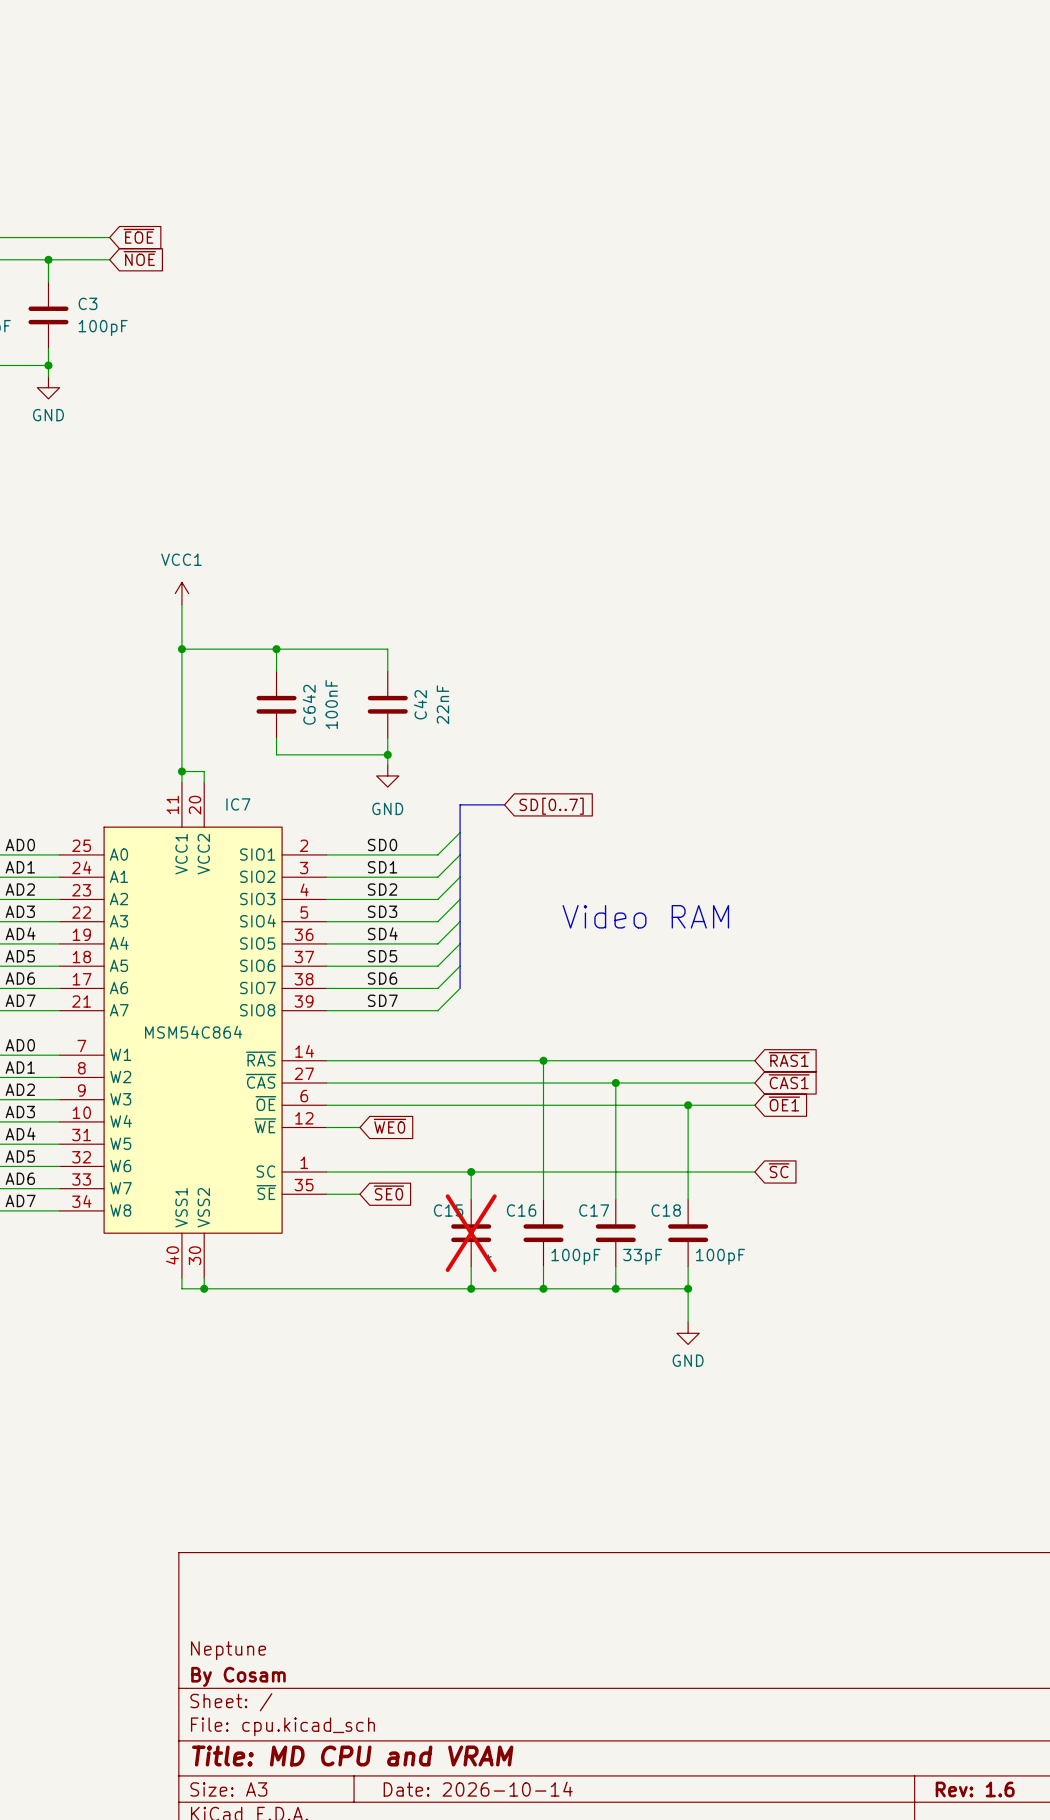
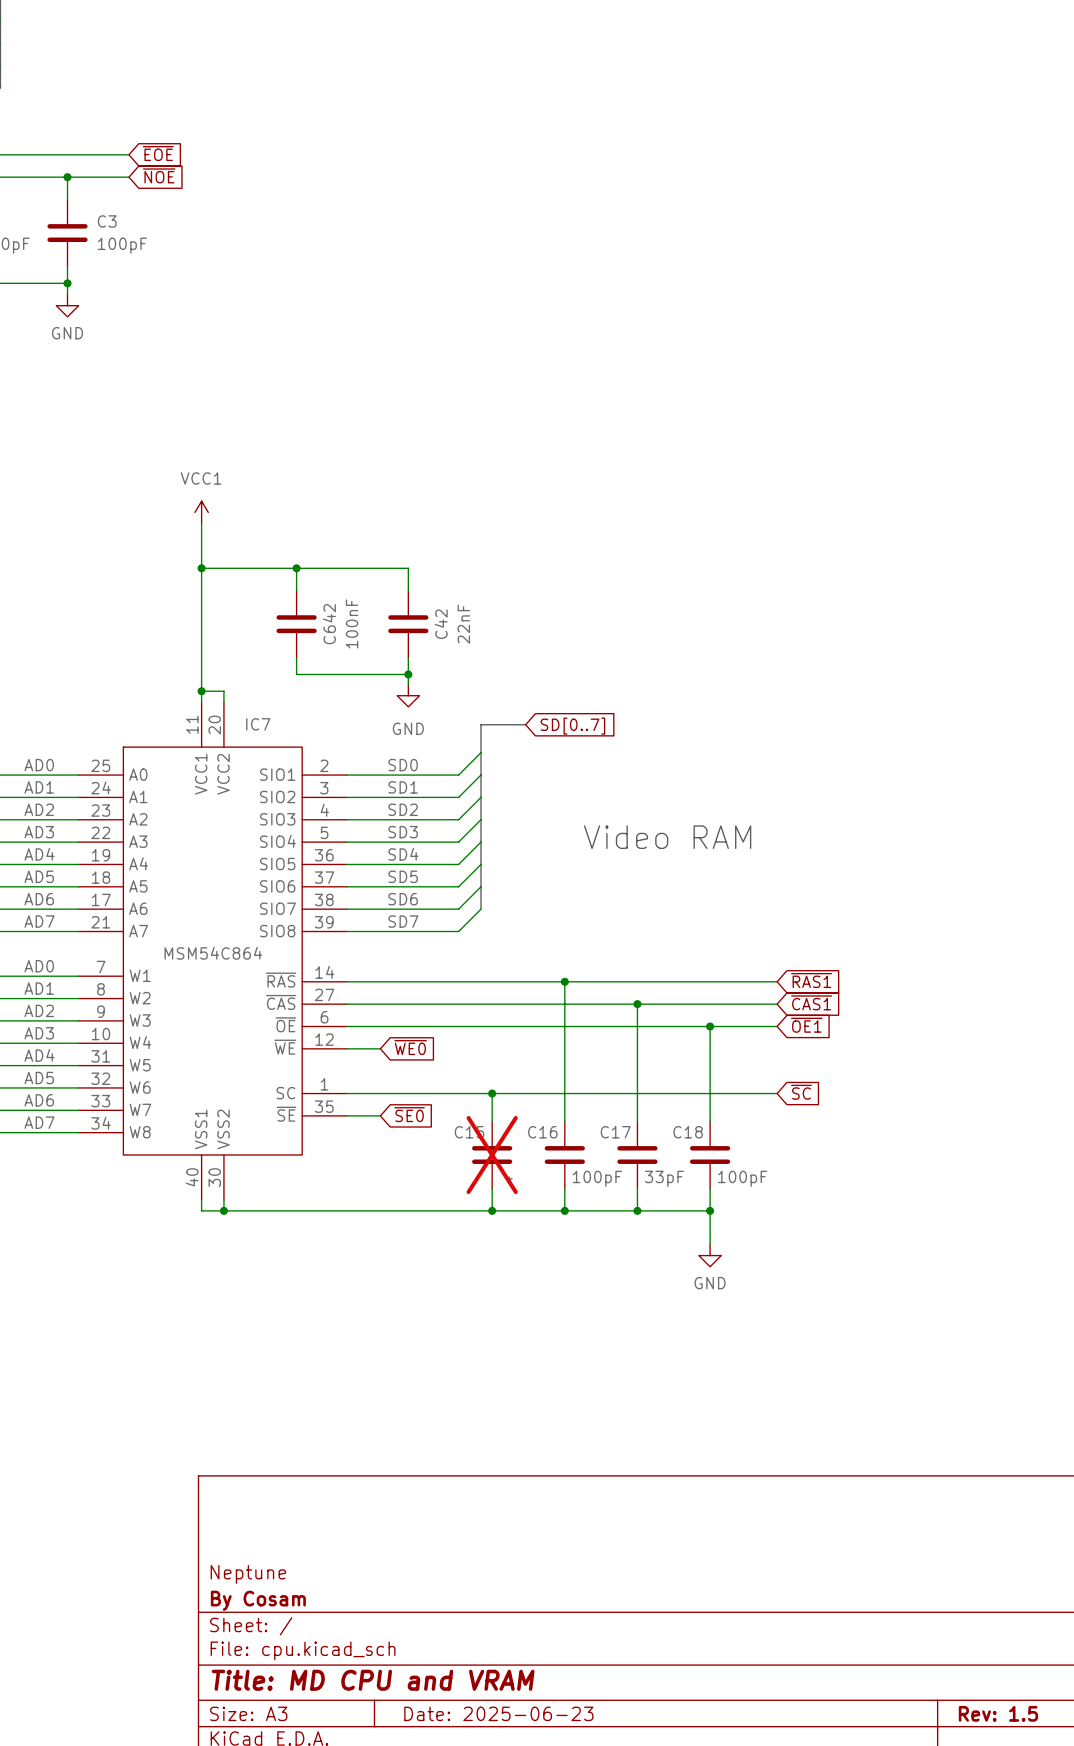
title block: Date: 2026-10-14 (478, 1789) -> Date: 2025-06-23 (498, 1713)
title block: Rev: 1.6 (975, 1789) -> Rev: 1.5 (998, 1713)

